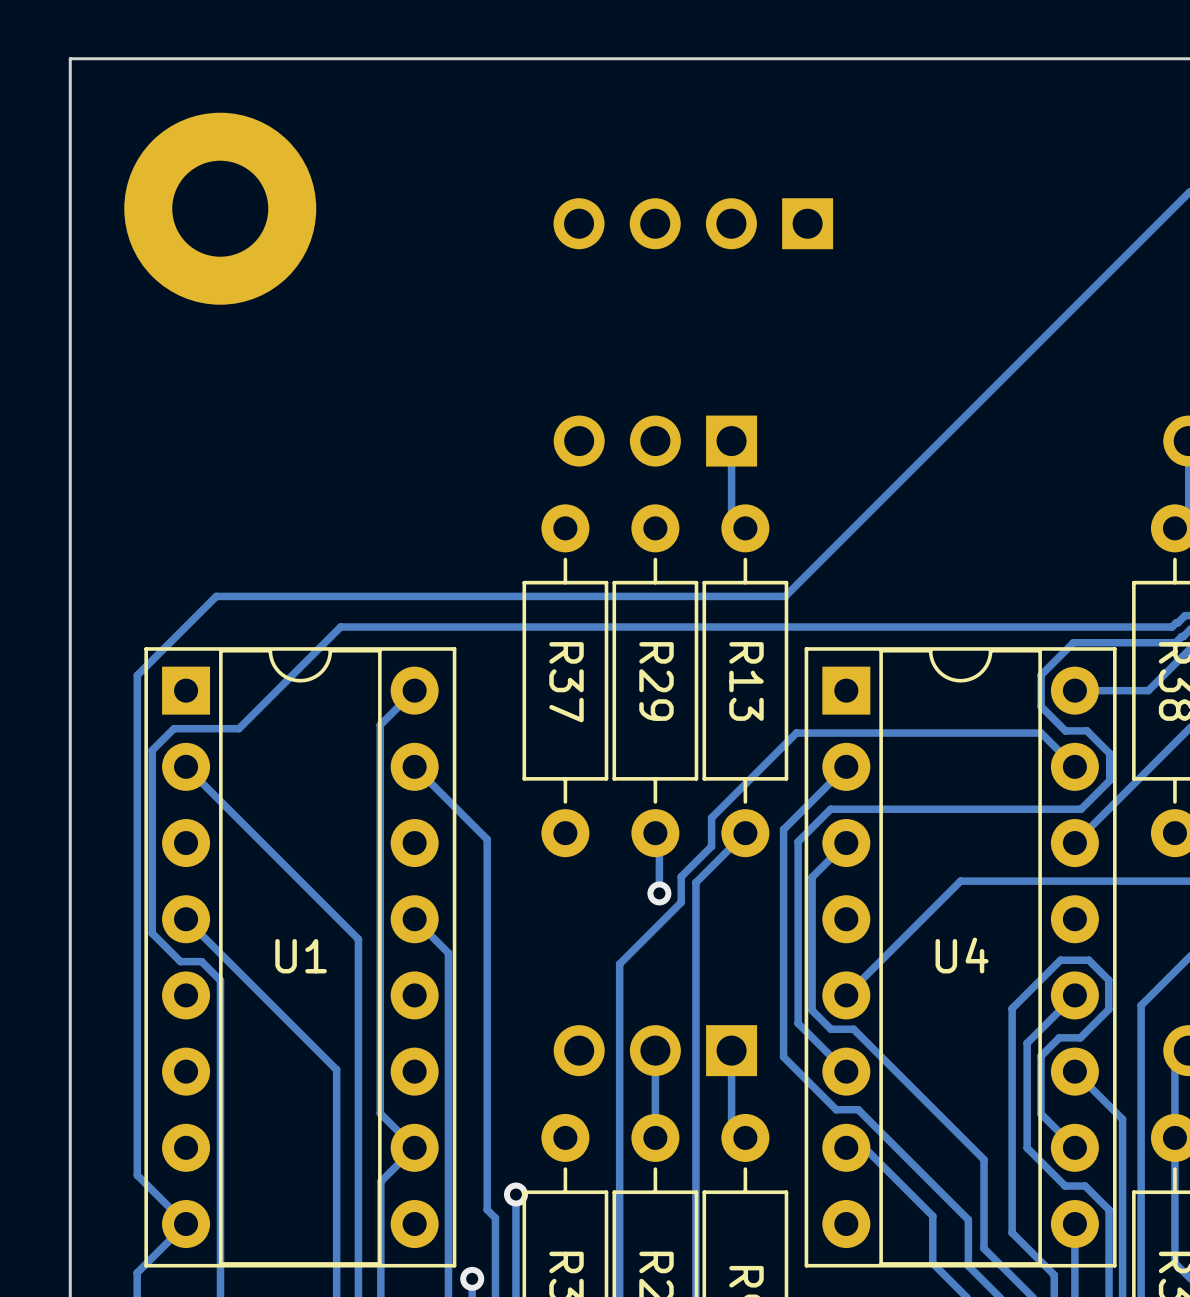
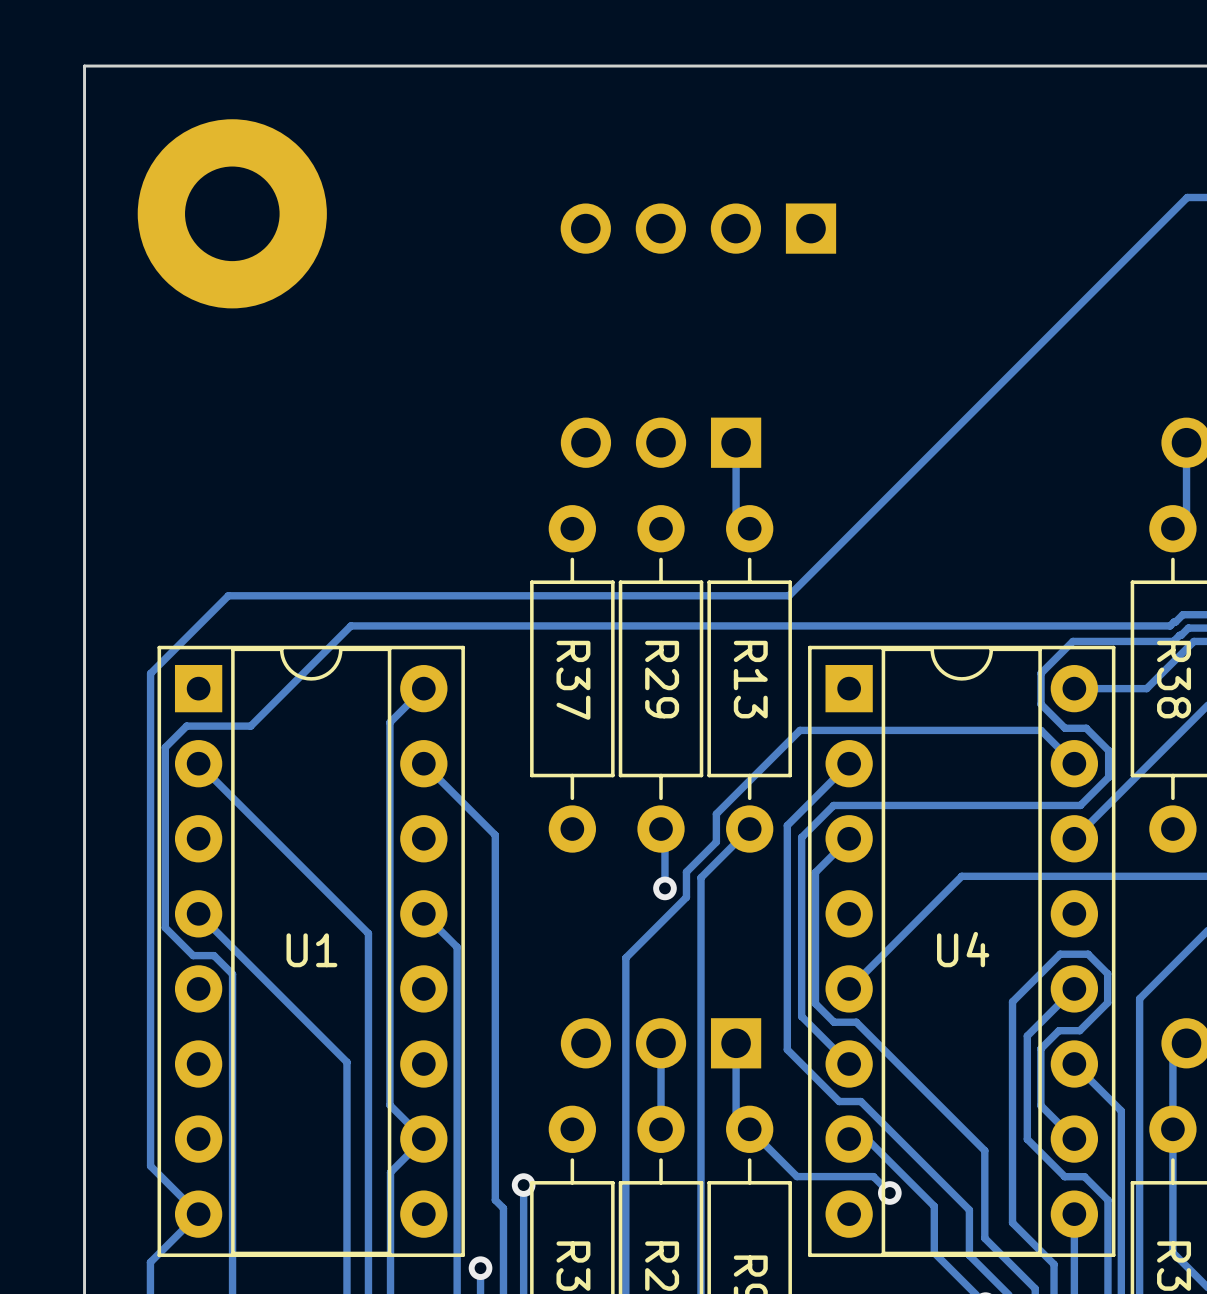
track: none -> (749, 1129) (796, 1176) (873, 1176) (889, 1193)
via: none -> (889, 1193)

